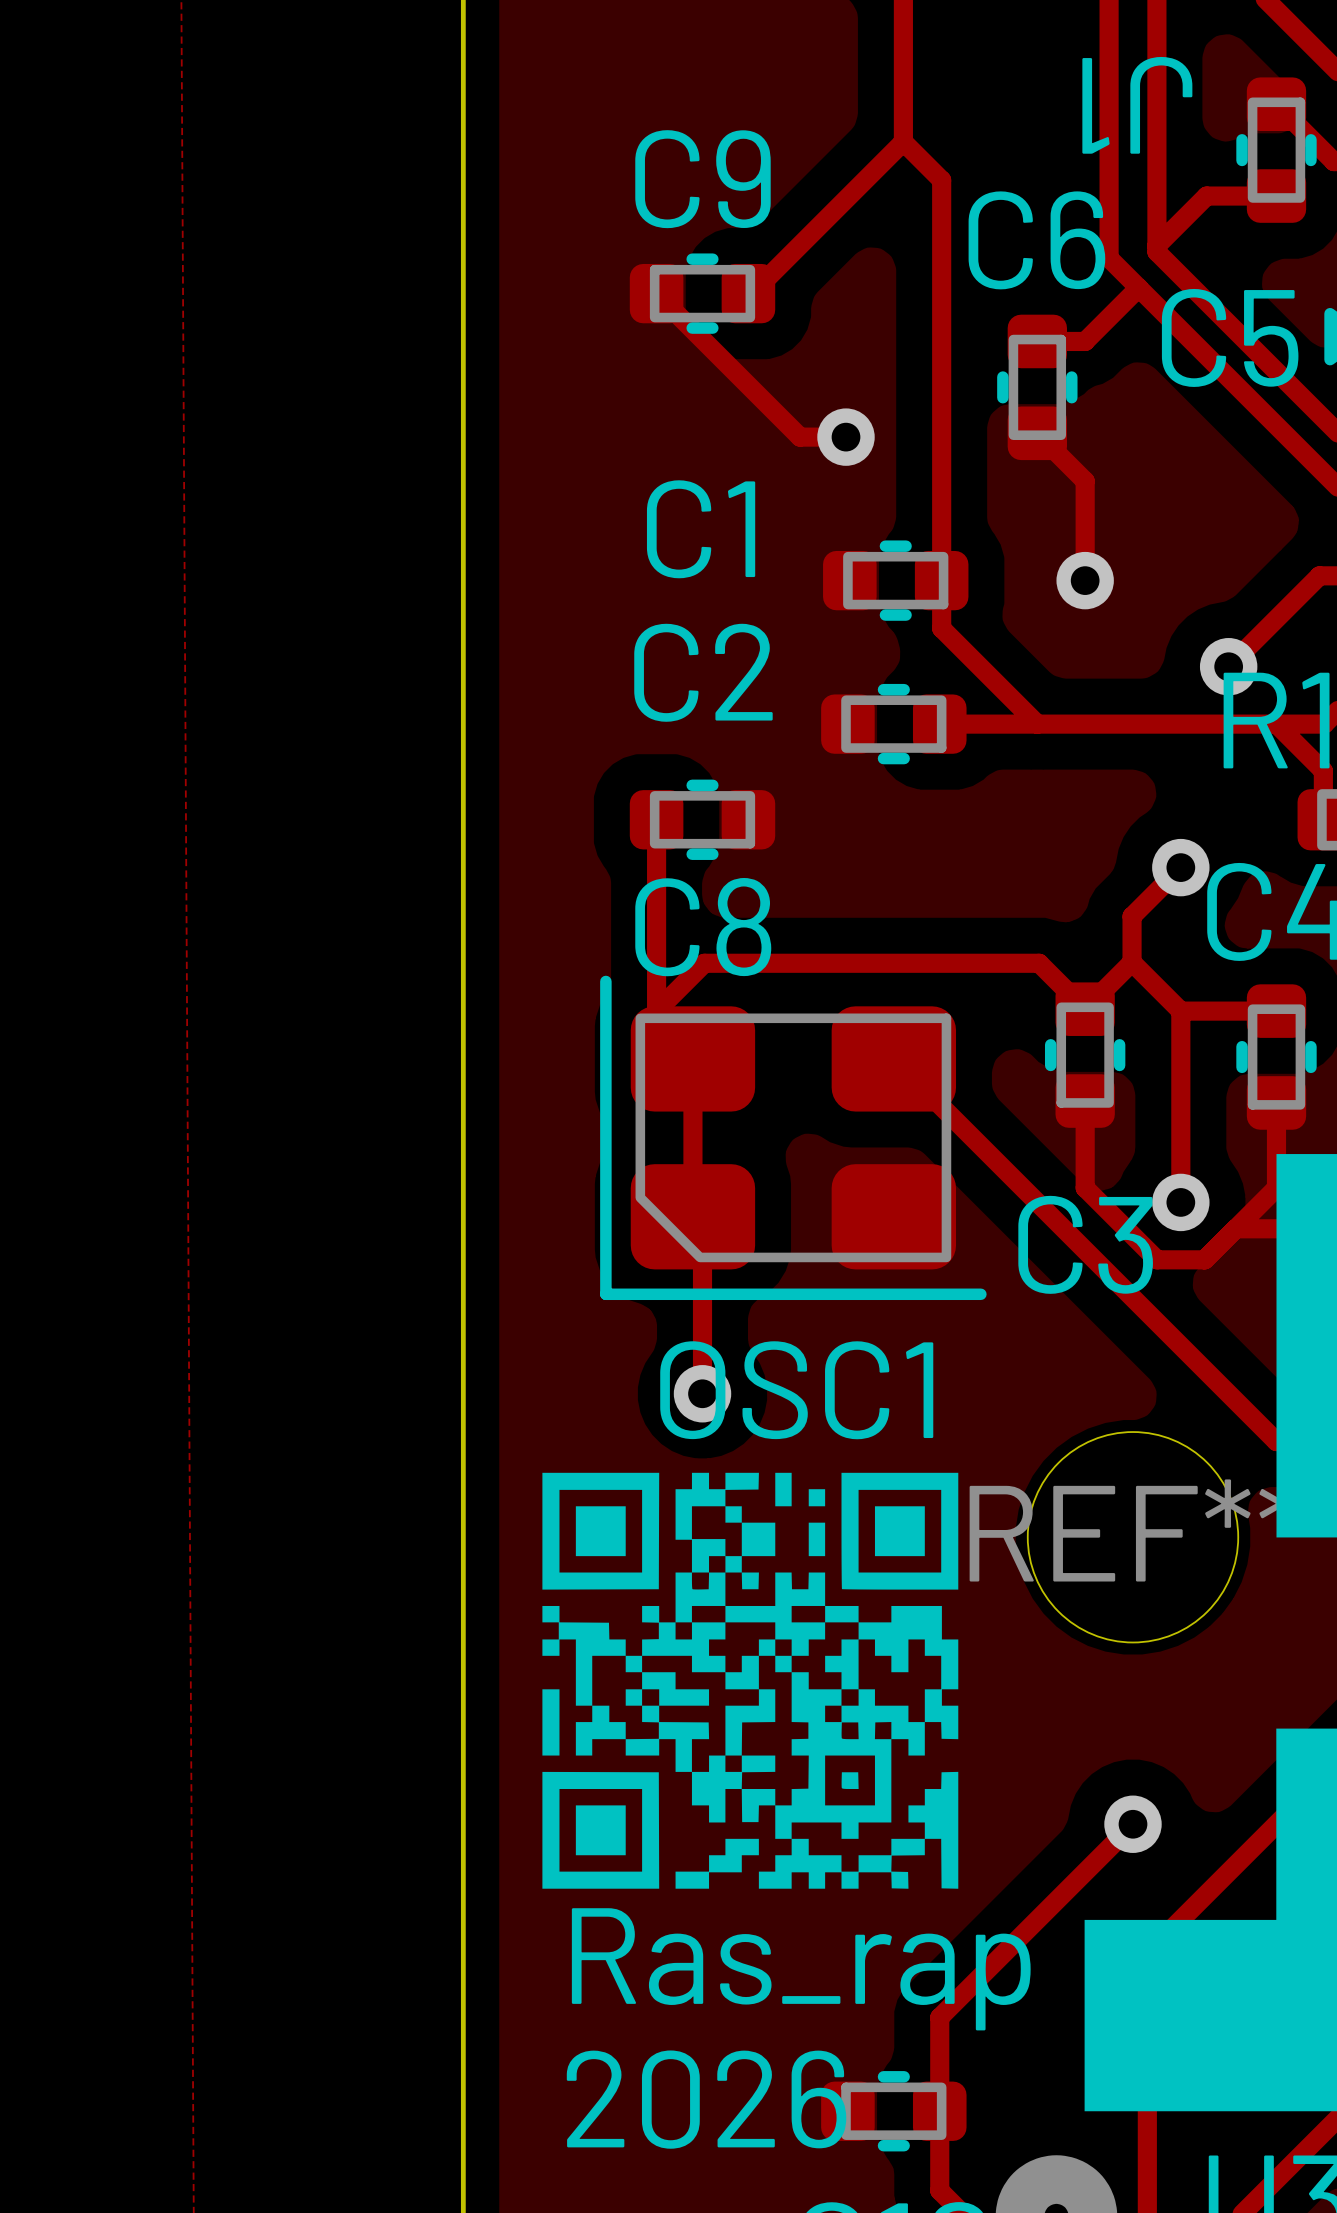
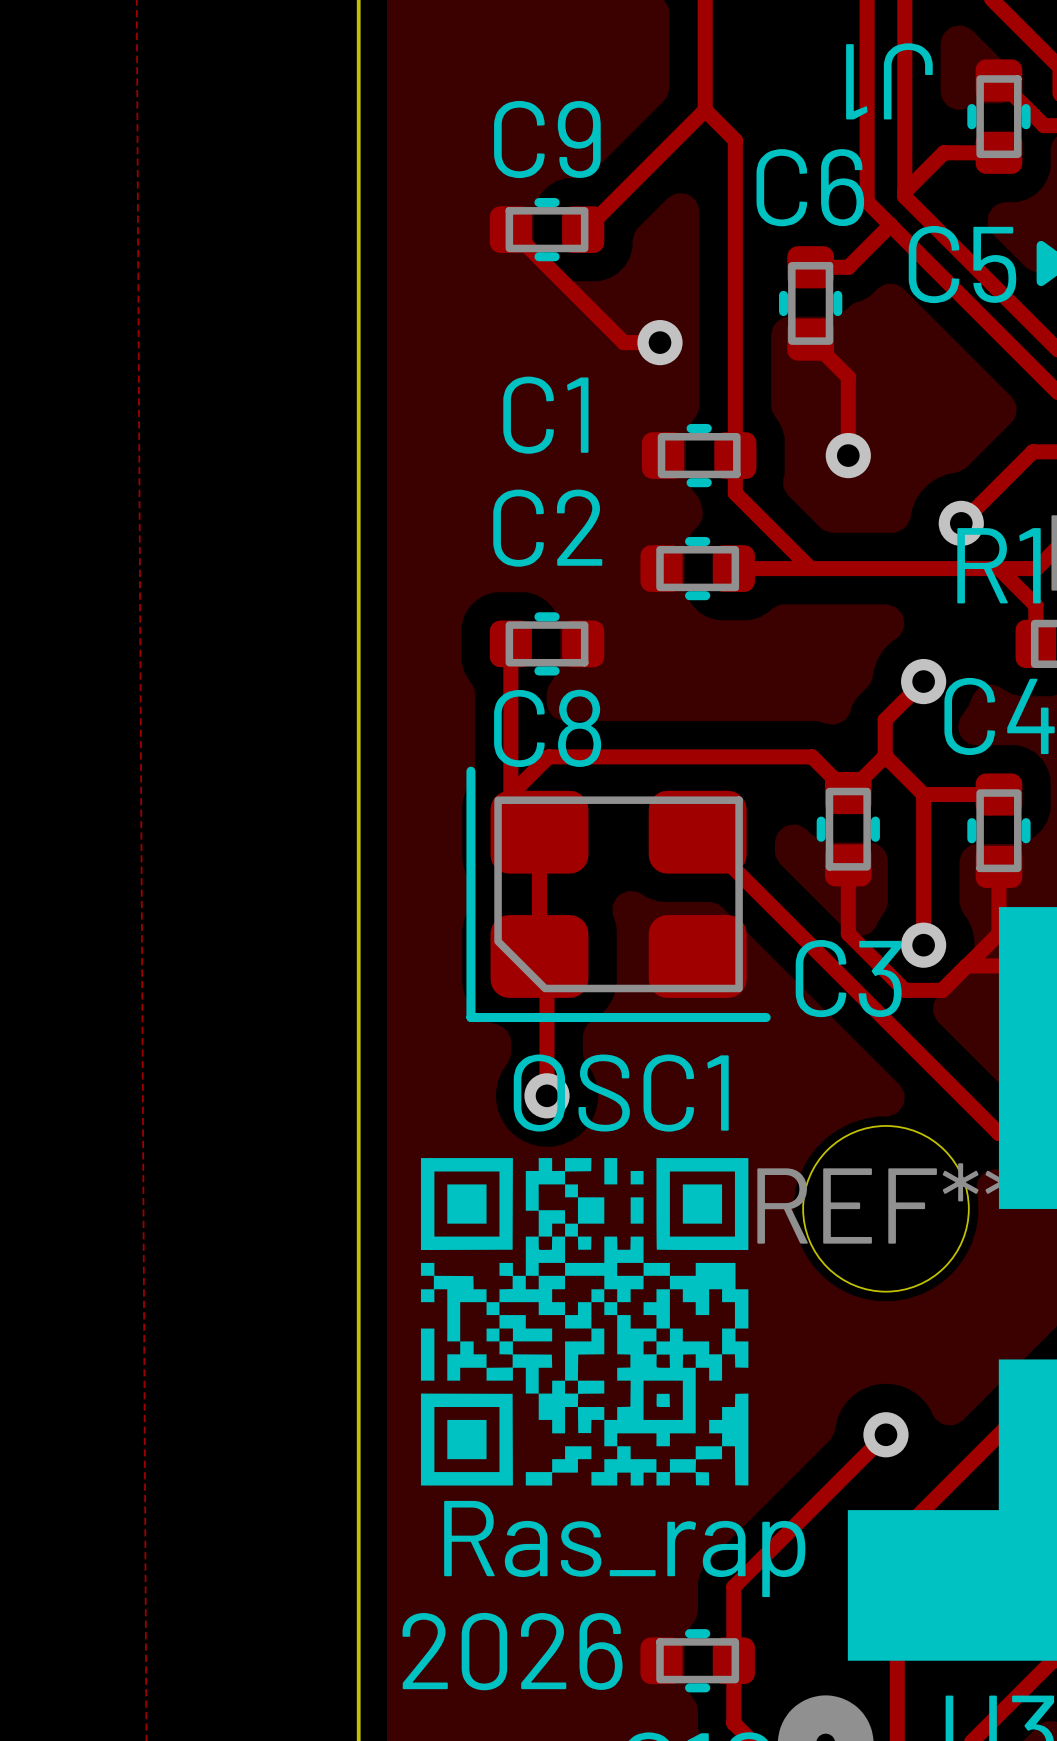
text position: 2026 (706, 2099) -> 2026 (512, 1651)

